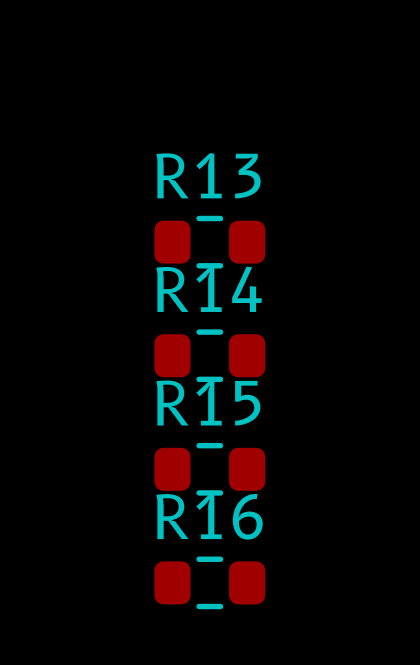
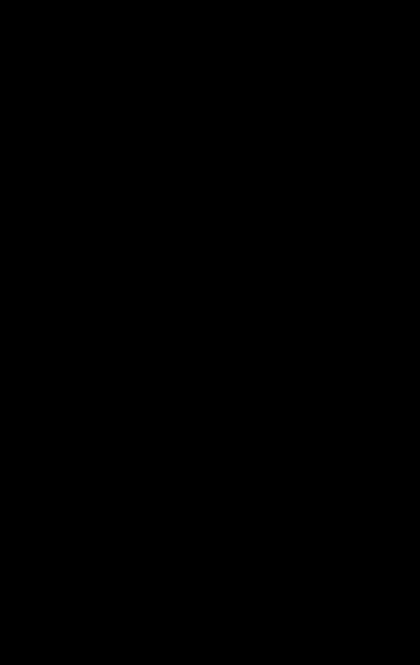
R13: (209, 242) -> none
R14: (209, 355) -> none
R15: (209, 469) -> none
R16: (209, 582) -> none

